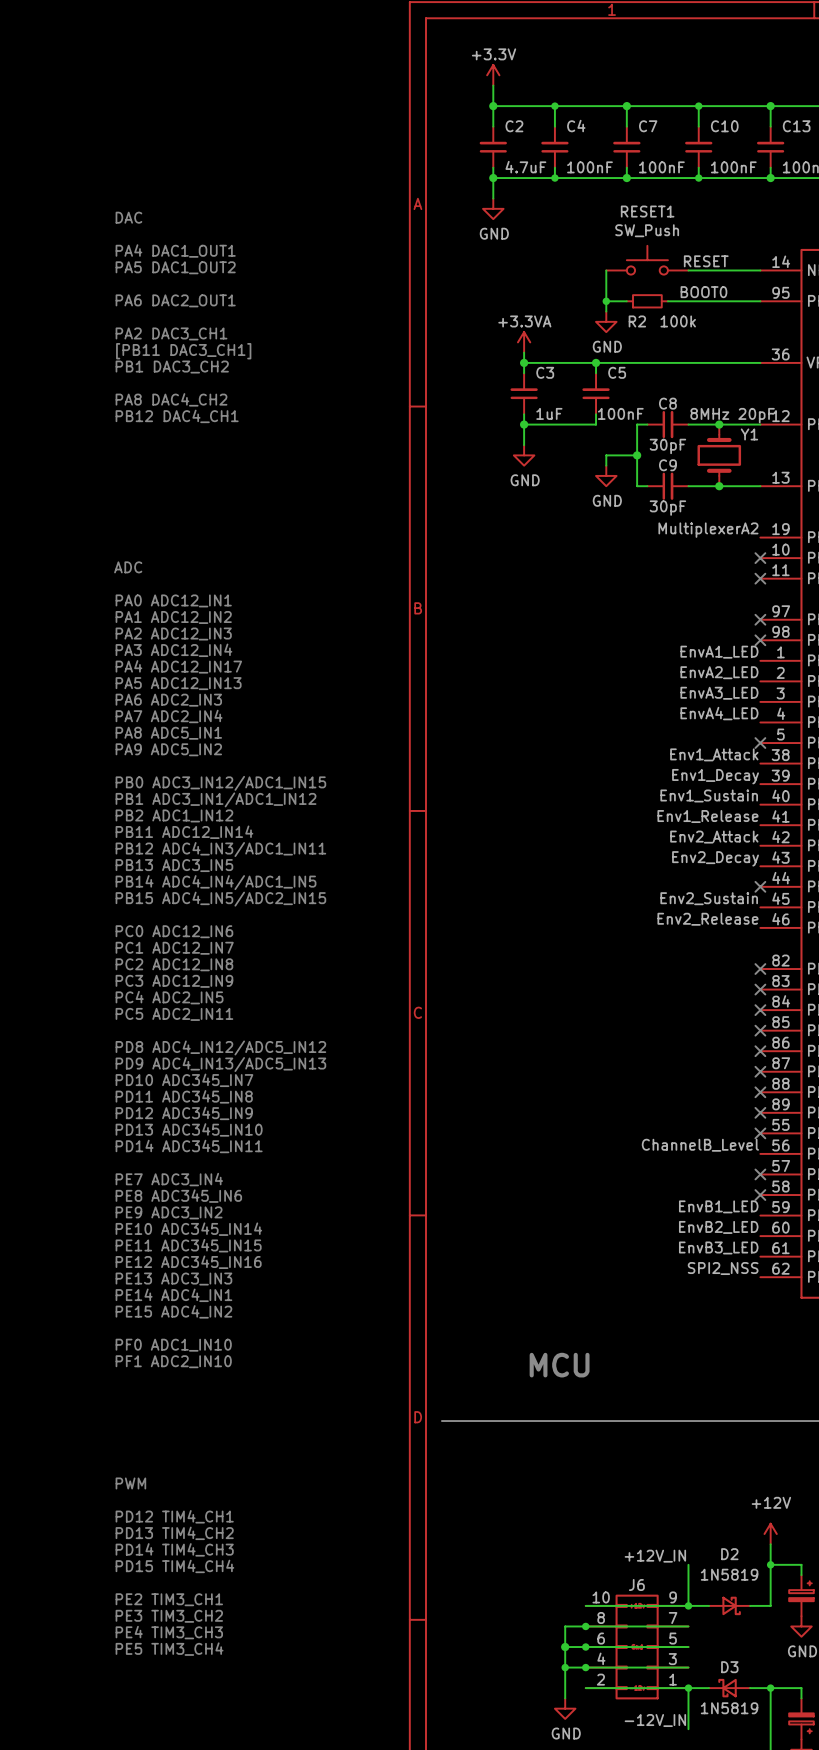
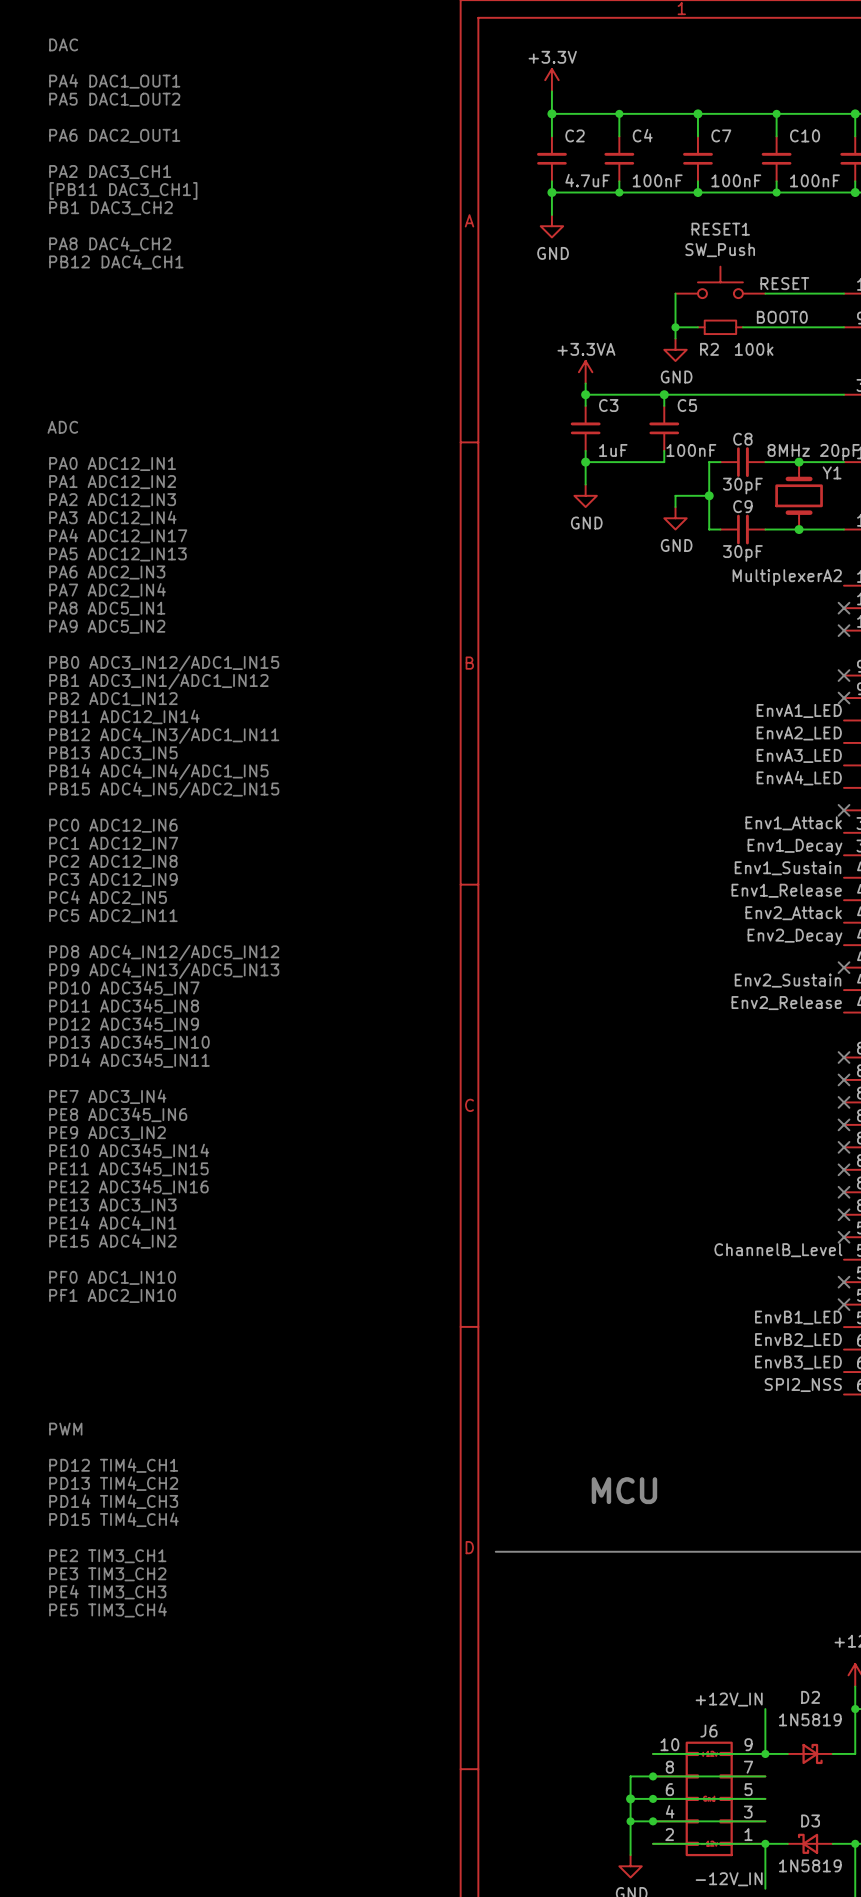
text position: DAC (128, 217) -> DAC (63, 44)
text position: PA4 DAC1_OUT1 (175, 251) -> PA4 DAC1_OUT1 (114, 81)
text position: PA5 DAC1_OUT2 (175, 267) -> PA5 DAC1_OUT2 (114, 99)
text position: PA6 DAC2_OUT1 (175, 300) -> PA6 DAC2_OUT1 (114, 135)
text position: PA2 DAC3_CH1 (171, 333) -> PA2 DAC3_CH1 (110, 172)
text position: [PB11 DAC3_CH1] (183, 351) -> [PB11 DAC3_CH1] (123, 190)
text position: PB1 DAC3_CH2 (172, 367) -> PB1 DAC3_CH2 (110, 208)
text position: PA8 DAC4_CH2 (171, 399) -> PA8 DAC4_CH2 (110, 244)
text position: PB12 DAC4_CH1 (177, 416) -> PB12 DAC4_CH1 (116, 262)
text position: ADC (128, 567) -> ADC (62, 427)
text position: PA0 ADC12_IN1 (173, 600) -> PA0 ADC12_IN1 (112, 464)
text position: PA1 ADC12_IN2 (173, 617) -> PA1 ADC12_IN2 (112, 482)
text position: PA2 ADC12_IN3 (173, 634) -> PA2 ADC12_IN3 (112, 500)
text position: PA3 ADC12_IN4 (173, 650) -> PA3 ADC12_IN4 (112, 518)
text position: PA4 ADC12_IN17 (178, 666) -> PA4 ADC12_IN17 (118, 536)
text position: PA5 ADC12_IN13 (178, 683) -> PA5 ADC12_IN13 (117, 554)
text position: PA6 ADC2_IN3 (168, 700) -> PA6 ADC2_IN3 (107, 572)
text position: PA7 ADC2_IN4 (169, 716) -> PA7 ADC2_IN4 (107, 590)
text position: PA8 ADC5_IN1 (168, 733) -> PA8 ADC5_IN1 (107, 608)
text position: PA9 ADC5_IN2 (168, 749) -> PA9 ADC5_IN2 (107, 626)
text position: PB0 ADC3_IN12/ADC1_IN15 (220, 783) -> PB0 ADC3_IN12/ADC1_IN15 (164, 663)
text position: PB1 ADC3_IN1/ADC1_IN12 (216, 799) -> PB1 ADC3_IN1/ADC1_IN12 (158, 681)
text position: PB2 ADC1_IN12 (174, 815) -> PB2 ADC1_IN12 (113, 699)
text position: PB11 ADC12_IN14 (184, 832) -> PB11 ADC12_IN14 (124, 716)
text position: PB12 ADC4_IN3/ADC1_IN11 (220, 849) -> PB12 ADC4_IN3/ADC1_IN11 (164, 735)
text position: PB13 ADC3_IN5 (174, 865) -> PB13 ADC3_IN5 (113, 753)
text position: PB14 ADC4_IN4/ADC1_IN5 (216, 882) -> PB14 ADC4_IN4/ADC1_IN5 (158, 772)
text position: PB15 ADC4_IN5/ADC2_IN15 (220, 899) -> PB15 ADC4_IN5/ADC2_IN15 (164, 790)
text position: PC0 ADC12_IN6 (174, 931) -> PC0 ADC12_IN6 (113, 825)
text position: PC1 ADC12_IN7 (174, 948) -> PC1 ADC12_IN7 (113, 843)
text position: PC2 ADC12_IN8 (174, 964) -> PC2 ADC12_IN8 (113, 861)
text position: PC3 ADC12_IN9 (174, 981) -> PC3 ADC12_IN9 (113, 879)
text position: PC4 ADC2_IN5 (169, 997) -> PC4 ADC2_IN5 (108, 897)
text position: PC5 ADC2_IN11 (174, 1014) -> PC5 ADC2_IN11 (113, 916)
text position: PD8 ADC4_IN12/ADC5_IN12 (220, 1047) -> PD8 ADC4_IN12/ADC5_IN12 (164, 952)
text position: PD9 ADC4_IN13/ADC5_IN13 (220, 1064) -> PD9 ADC4_IN13/ADC5_IN13 (164, 970)
text position: PD10 ADC345_IN7 (184, 1080) -> PD10 ADC345_IN7 (124, 988)
text position: PD11 ADC345_IN8 (184, 1096) -> PD11 ADC345_IN8 (124, 1006)
text position: PD12 ADC345_IN9 (184, 1113) -> PD12 ADC345_IN9 (124, 1024)
text position: PD13 ADC345_IN10 (189, 1129) -> PD13 ADC345_IN10 (129, 1042)
text position: PD14 ADC345_IN11 (189, 1146) -> PD14 ADC345_IN11 (129, 1060)
text position: PE7 ADC3_IN4 (169, 1179) -> PE7 ADC3_IN4 (107, 1096)
text position: PE8 ADC345_IN6 (178, 1196) -> PE8 ADC345_IN6 (118, 1114)
text position: PE9 ADC3_IN2 (169, 1212) -> PE9 ADC3_IN2 (107, 1133)
text position: PE10 ADC345_IN14 (188, 1229) -> PE10 ADC345_IN14 (129, 1151)
text position: PE11 ADC345_IN15 (188, 1245) -> PE11 ADC345_IN15 (128, 1169)
text position: PE12 ADC345_IN16 (188, 1262) -> PE12 ADC345_IN16 (128, 1187)
text position: PE13 ADC3_IN3 (173, 1279) -> PE13 ADC3_IN3 (112, 1205)
text position: PE14 ADC4_IN1 (173, 1295) -> PE14 ADC4_IN1 (112, 1223)
text position: PE15 ADC4_IN2 (173, 1311) -> PE15 ADC4_IN2 (112, 1241)
text position: PF0 ADC1_IN10 (173, 1345) -> PF0 ADC1_IN10 (112, 1277)
text position: PF1 ADC2_IN10 (173, 1361) -> PF1 ADC2_IN10 (112, 1295)
text position: PWM (130, 1483) -> PWM (65, 1429)
text position: PD12 TIM4_CH1 (174, 1516) -> PD12 TIM4_CH1 (113, 1465)
text position: PD13 TIM4_CH2 (174, 1533) -> PD13 TIM4_CH2 (113, 1483)
text position: PD14 TIM4_CH3 (174, 1549) -> PD14 TIM4_CH3 (113, 1501)
text position: PD15 TIM4_CH4 (174, 1566) -> PD15 TIM4_CH4 (113, 1519)
text position: PE2 TIM3_CH1 (169, 1599) -> PE2 TIM3_CH1 (107, 1556)
text position: PE3 TIM3_CH2 (169, 1616) -> PE3 TIM3_CH2 (107, 1574)
text position: PE4 TIM3_CH3 (169, 1632) -> PE4 TIM3_CH3 (107, 1592)
text position: PE5 TIM3_CH4 (169, 1649) -> PE5 TIM3_CH4 (108, 1610)

